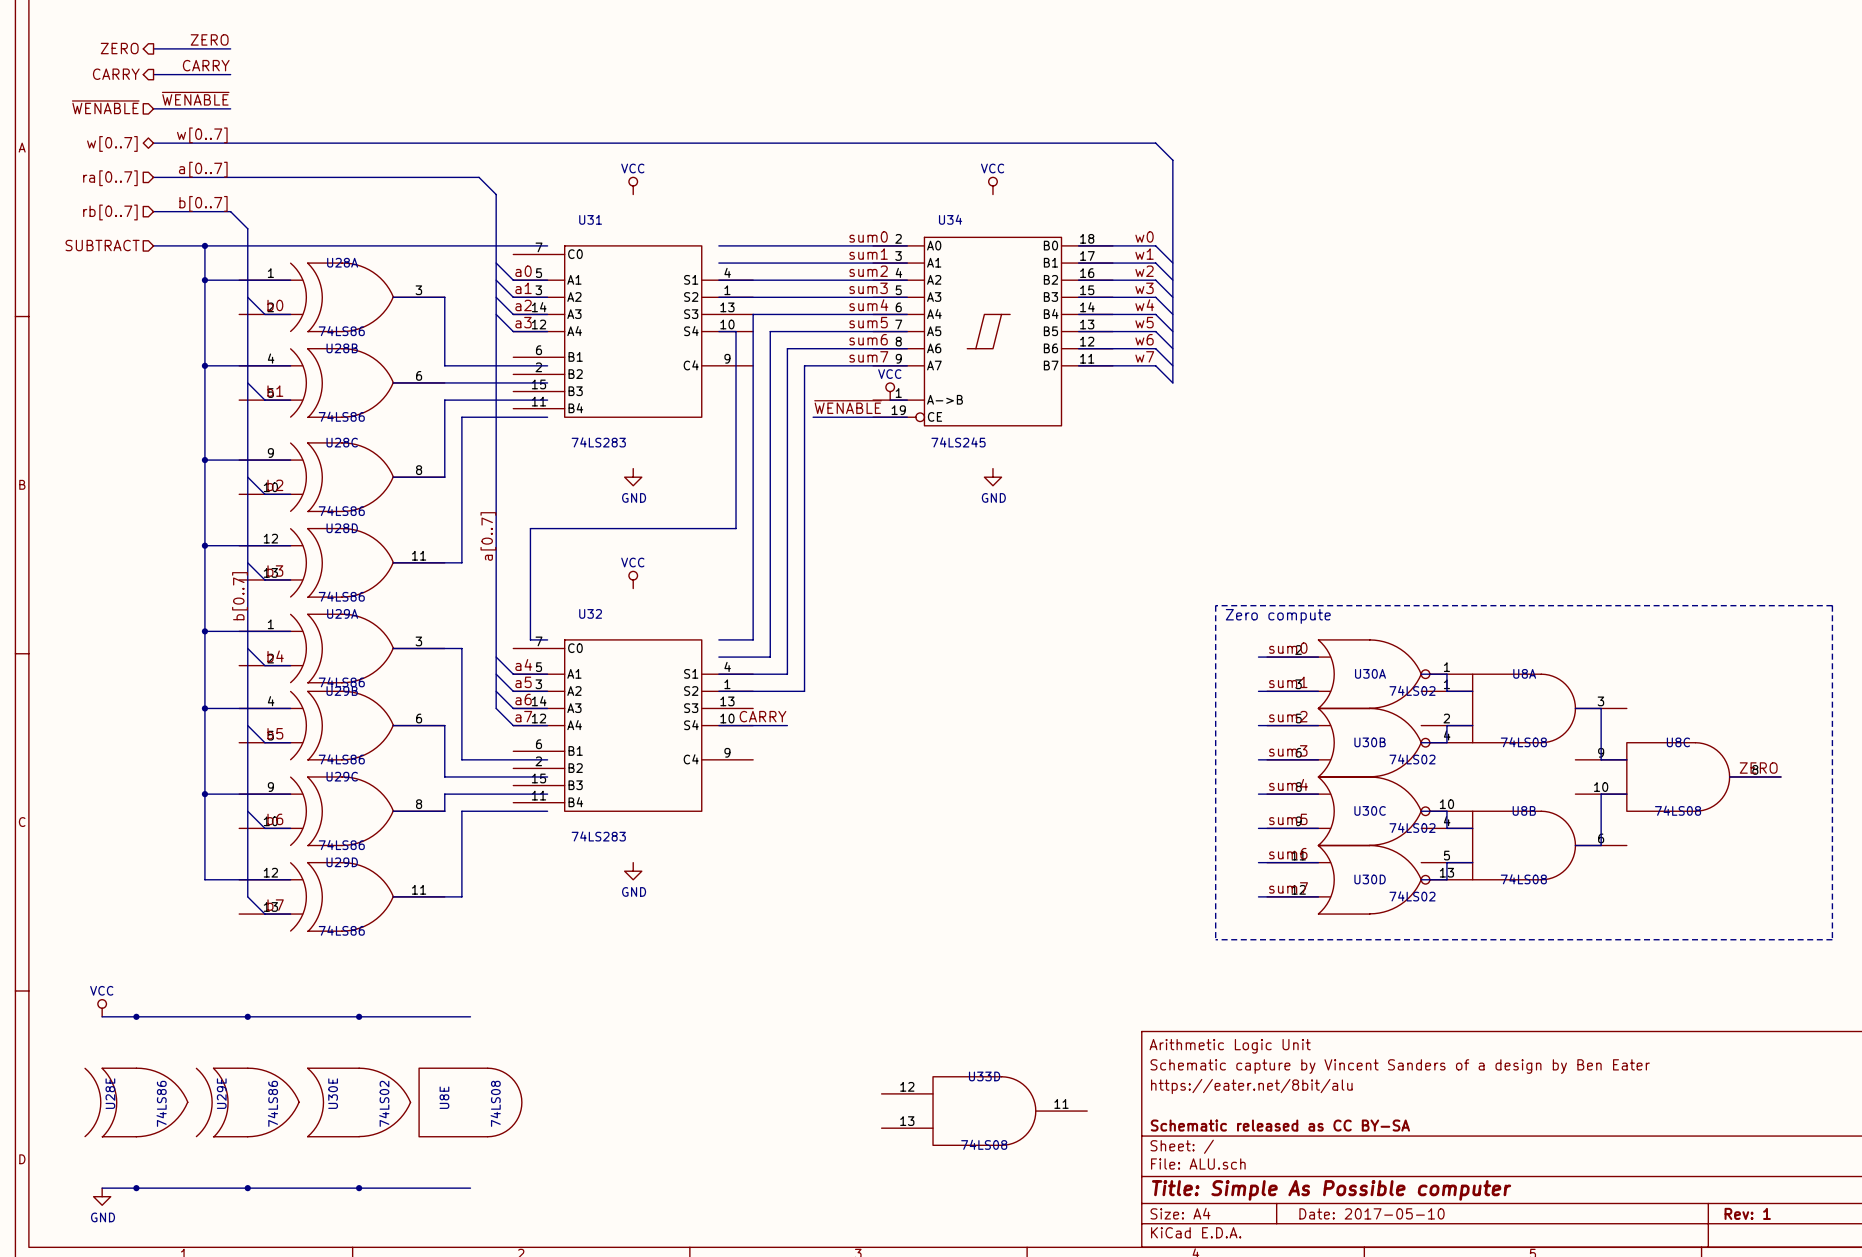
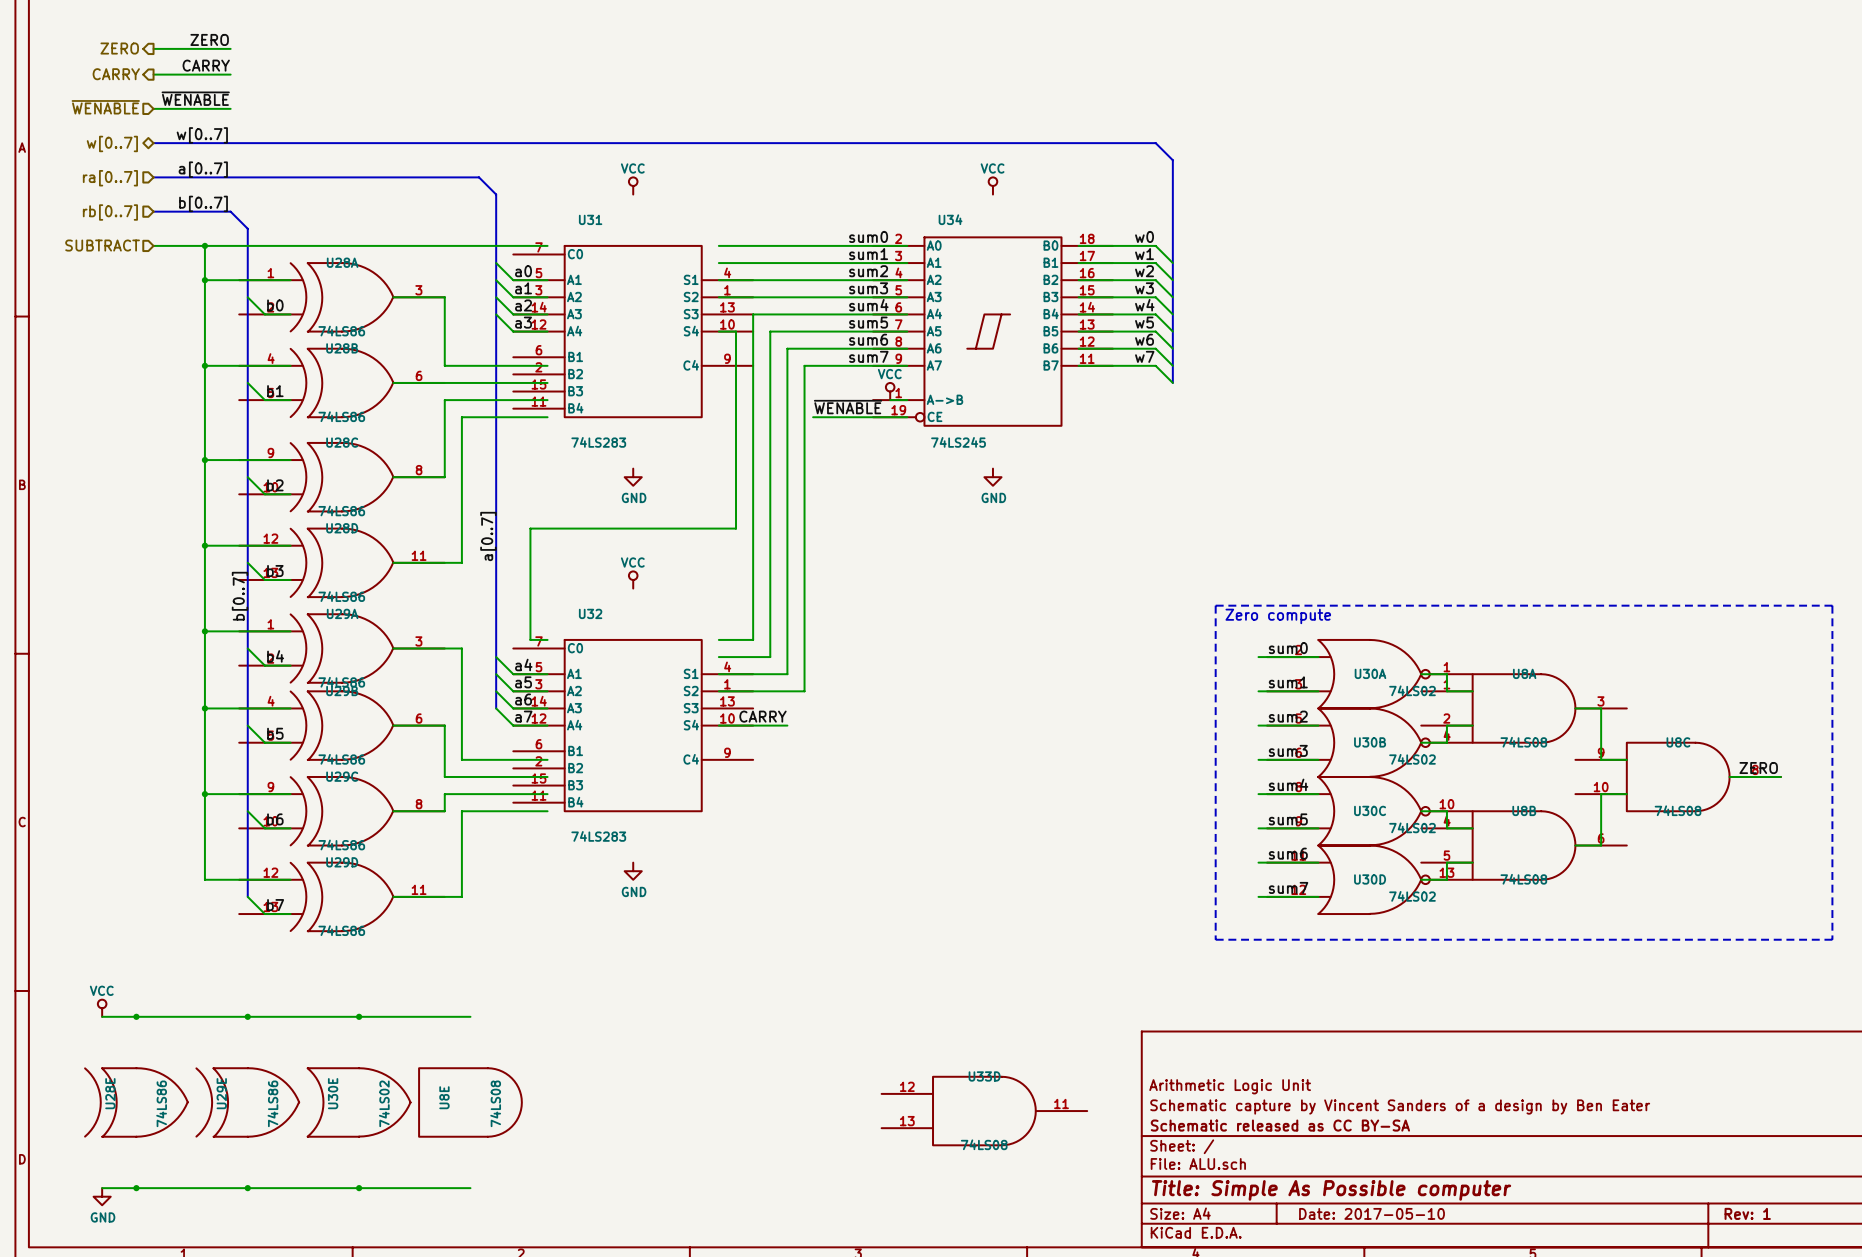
title block: Arithmetic Logic Unit (1230, 1046) -> none
title block position: Schematic capture by Vincent Sanders of a design by Ben Eater (1400, 1066) -> Schematic capture by Vincent Sanders of a design by Ben Eater (1400, 1107)
title block: https://eater.net/8bit/alu (1251, 1086) -> Arithmetic Logic Unit (1230, 1086)

